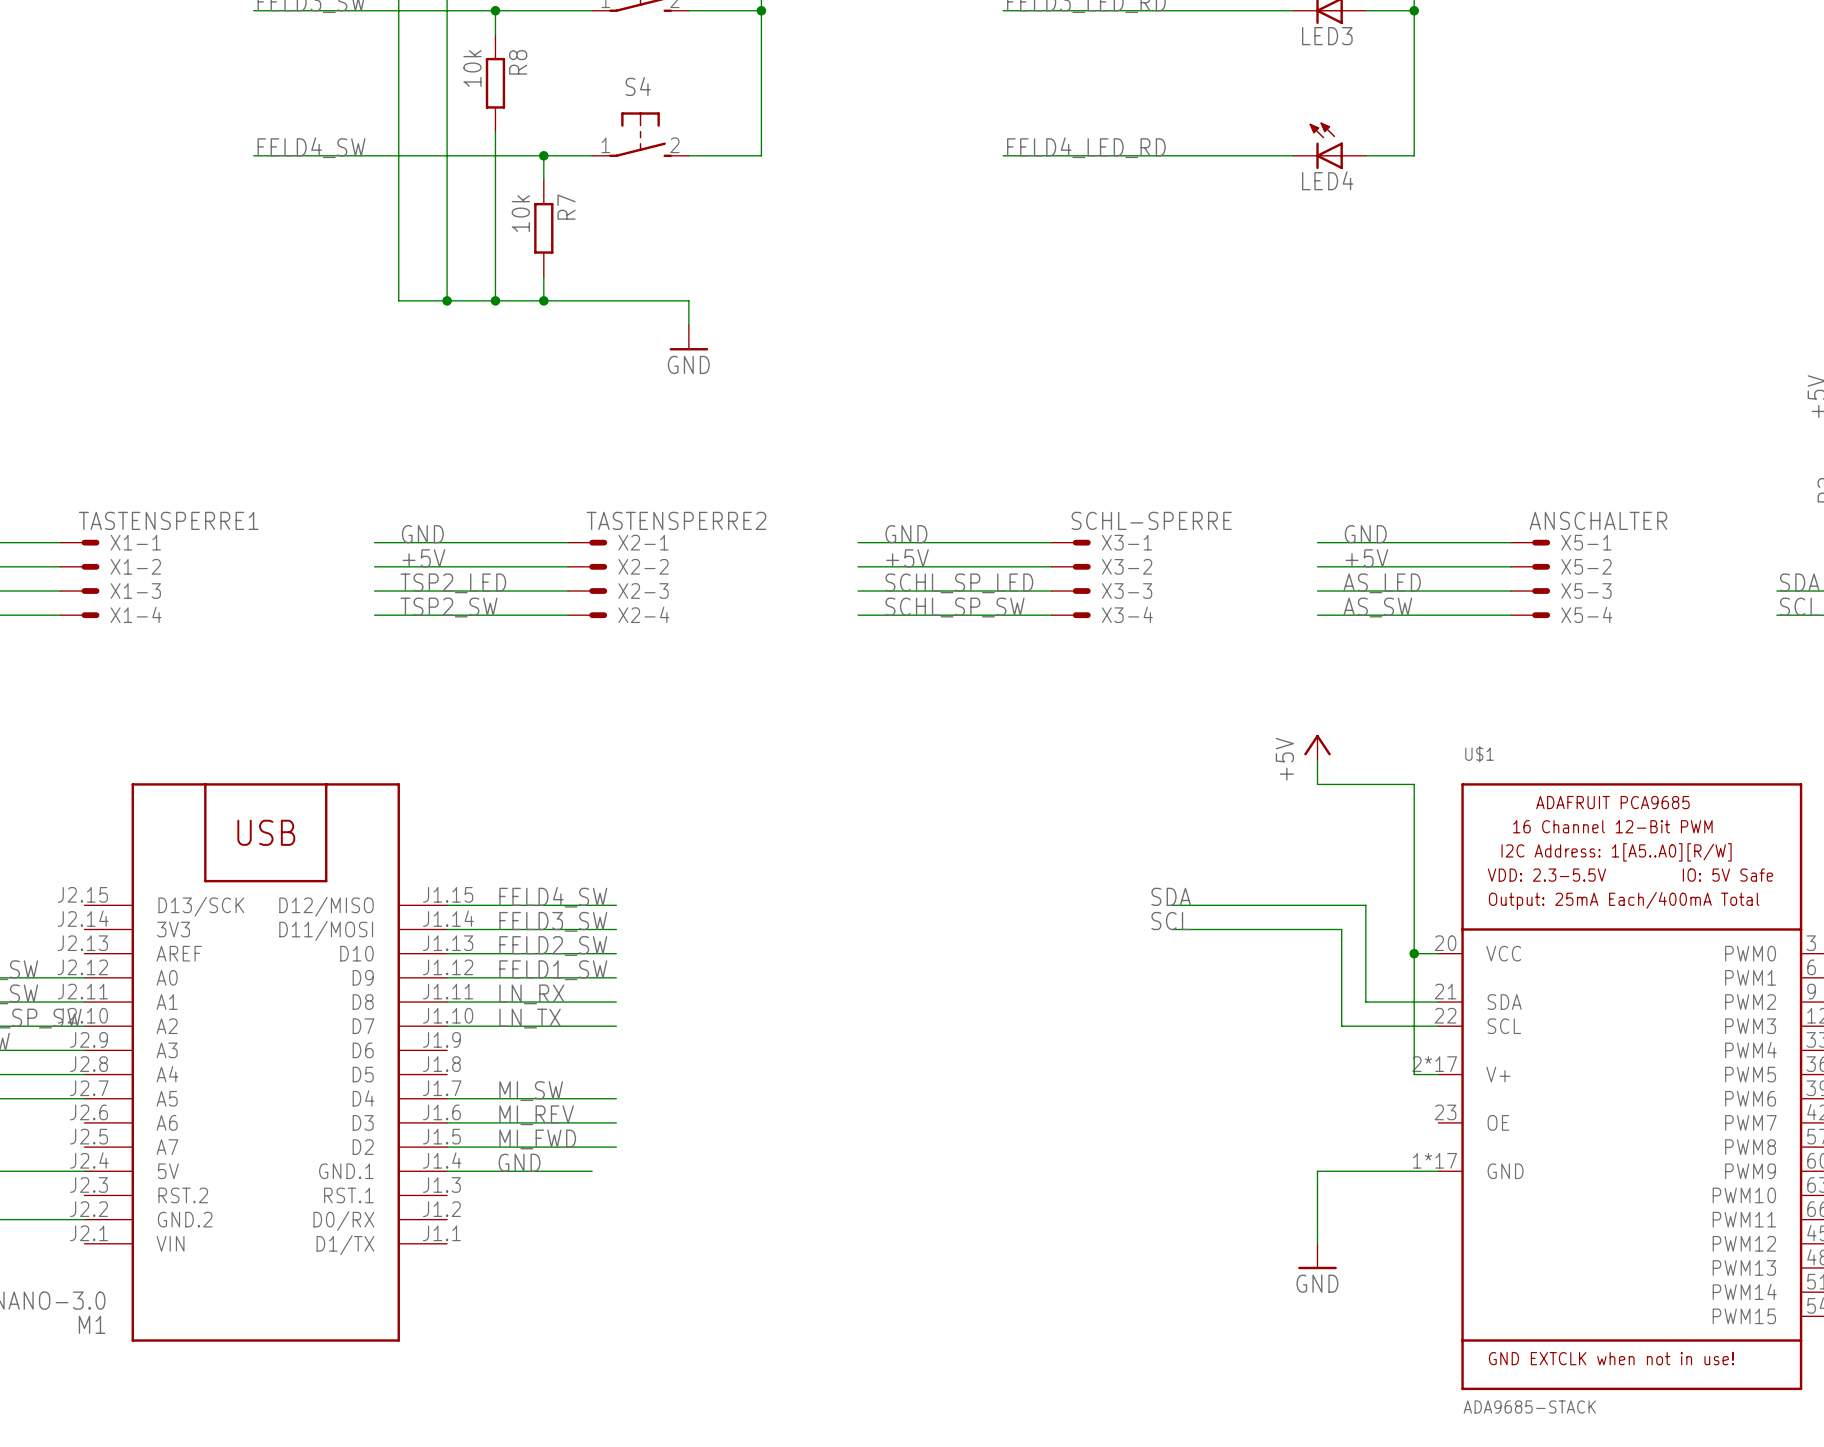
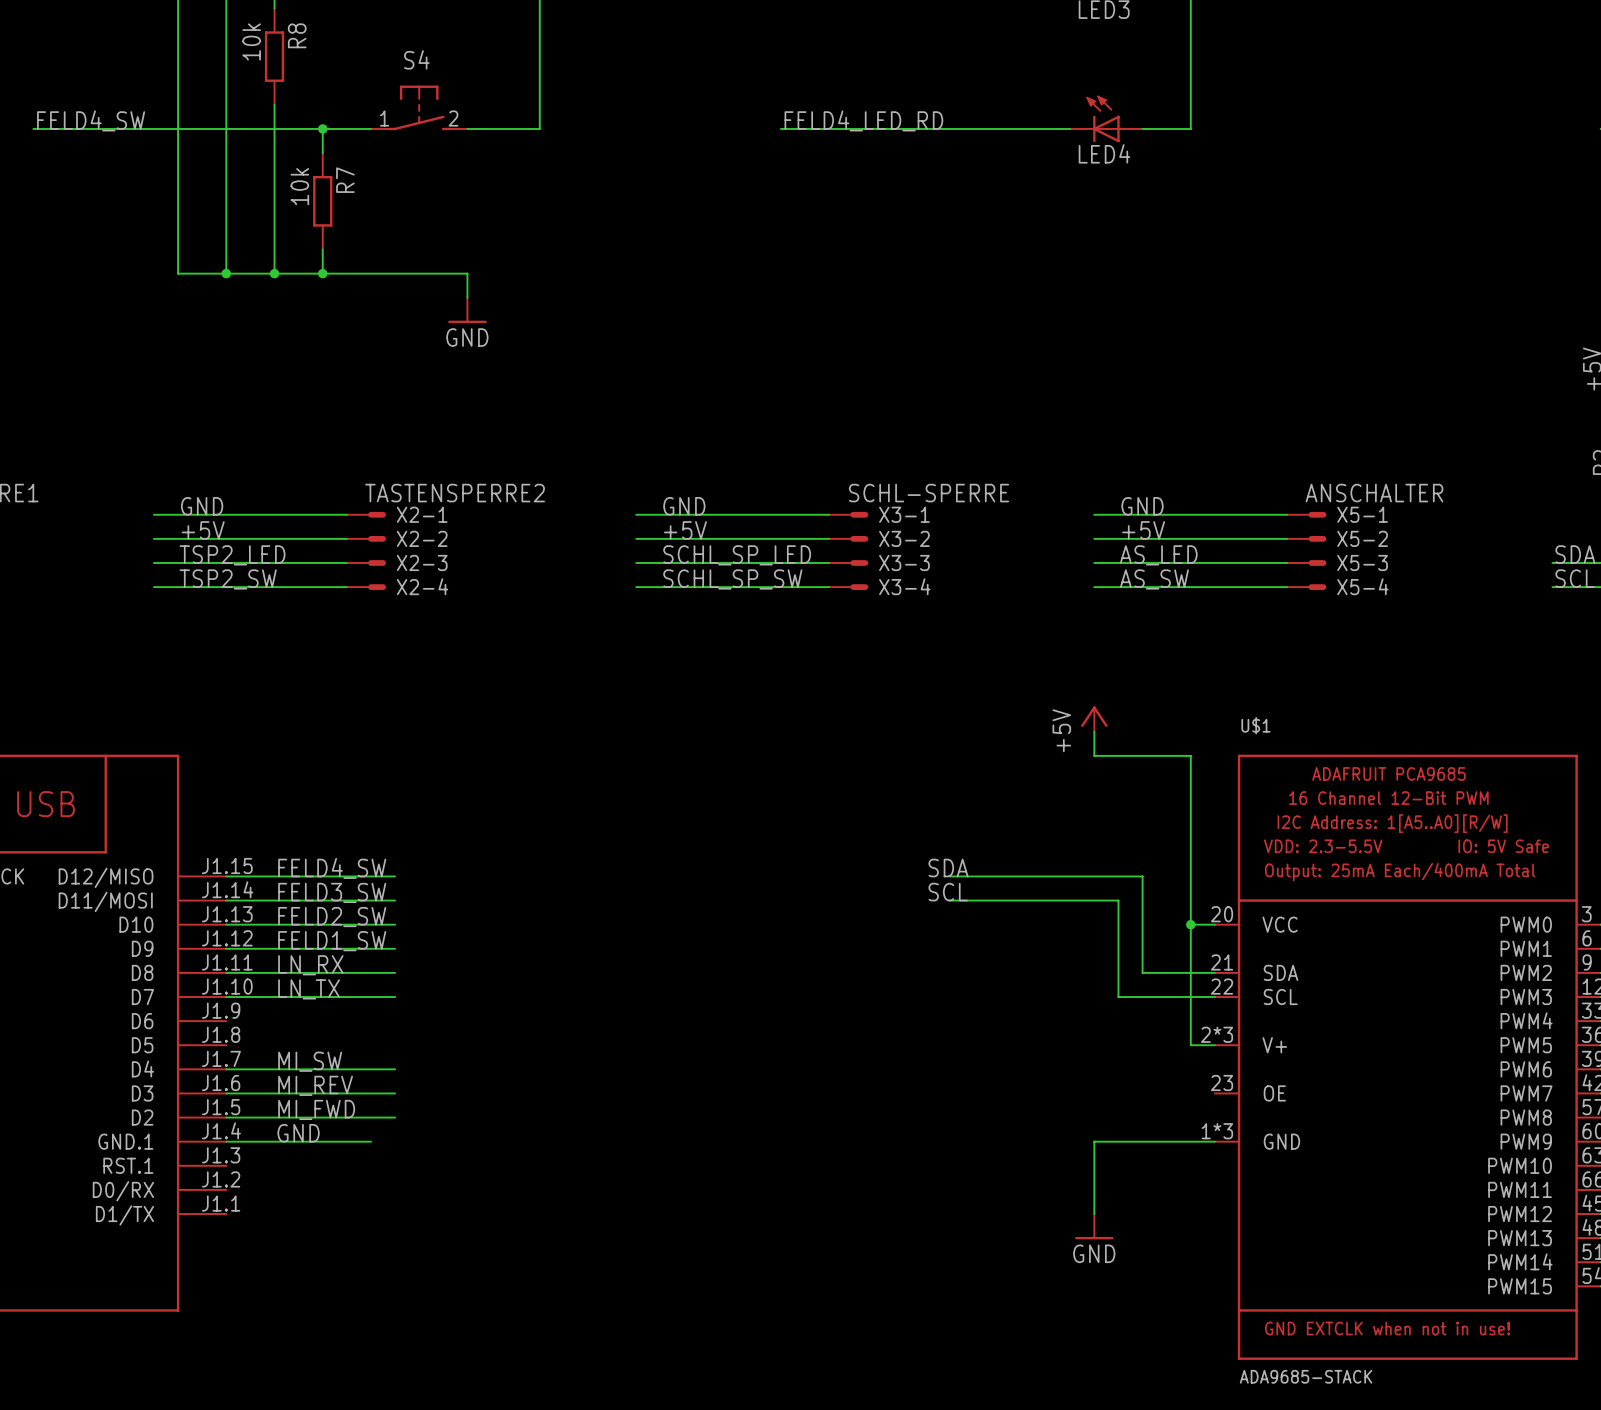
U$1 pin number: 2*17 (1434, 1064) -> 2*3 (1217, 1034)
U$1 pin number: 1*17 (1434, 1160) -> 1*3 (1217, 1131)

